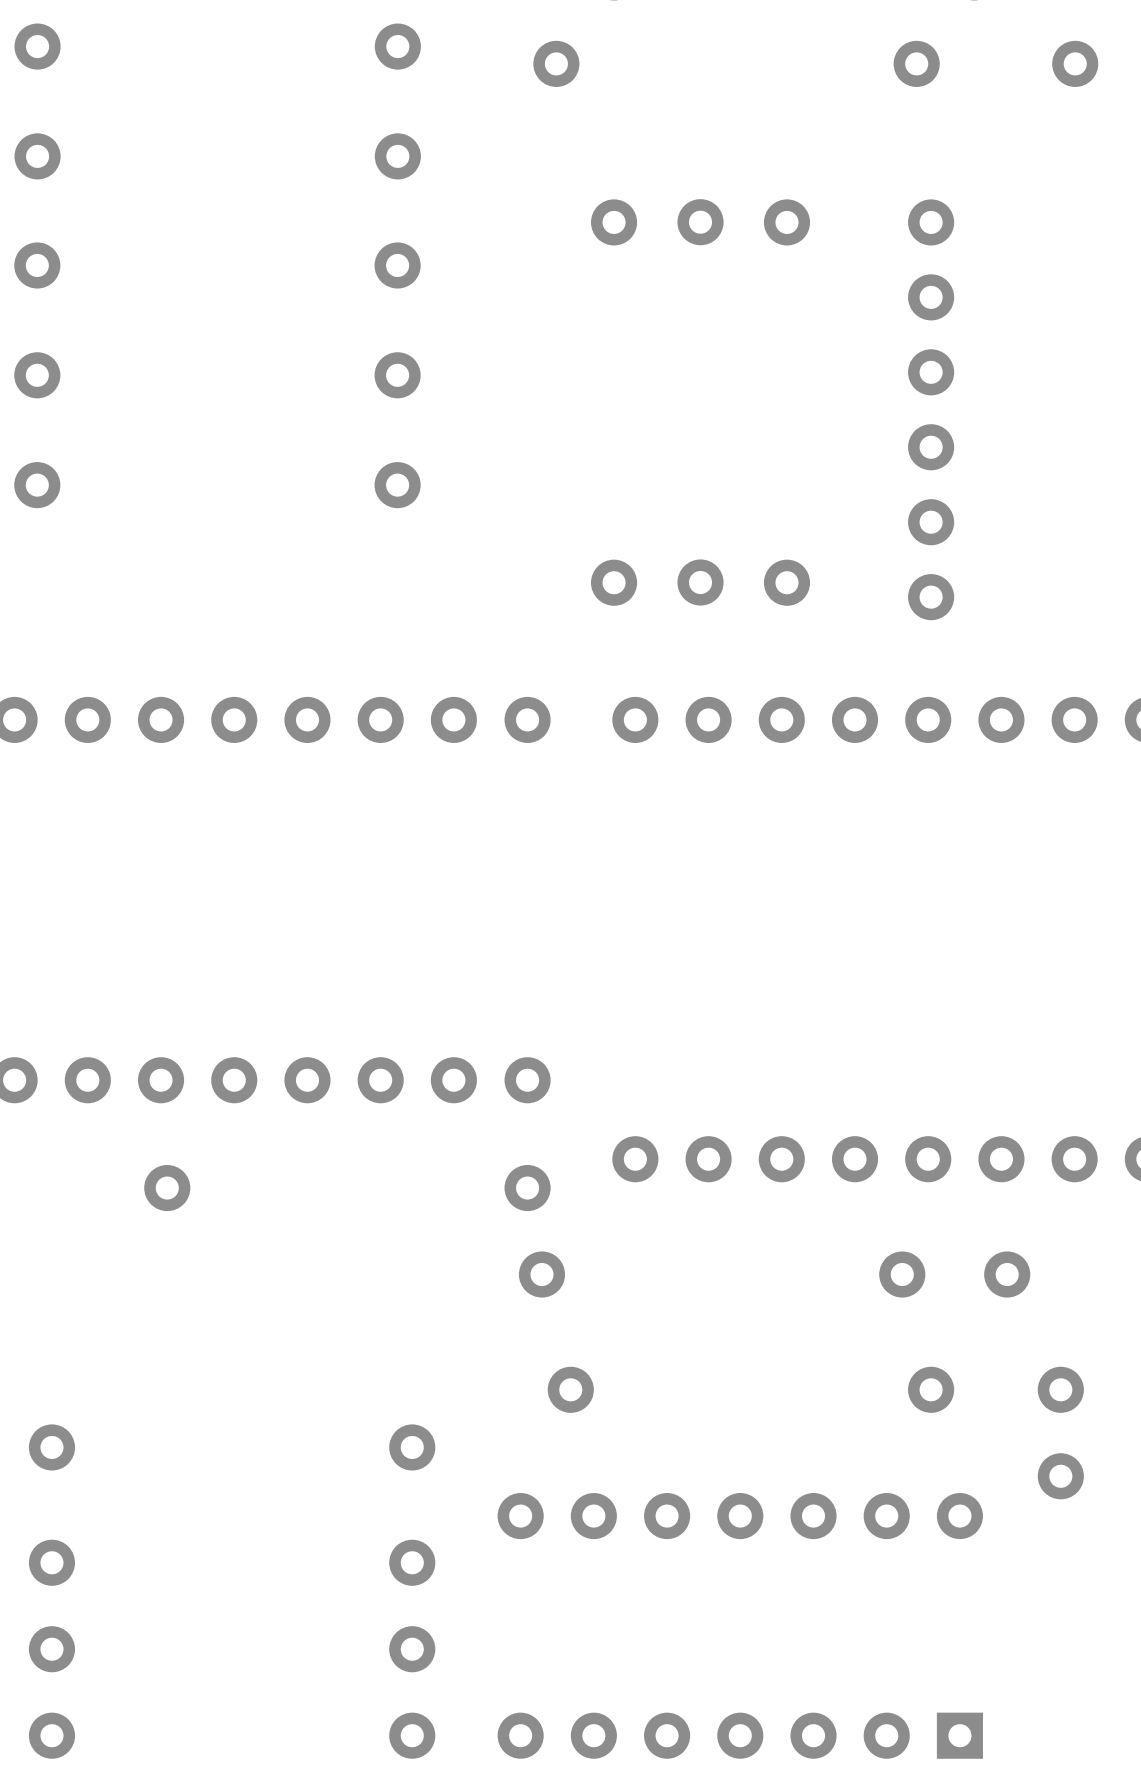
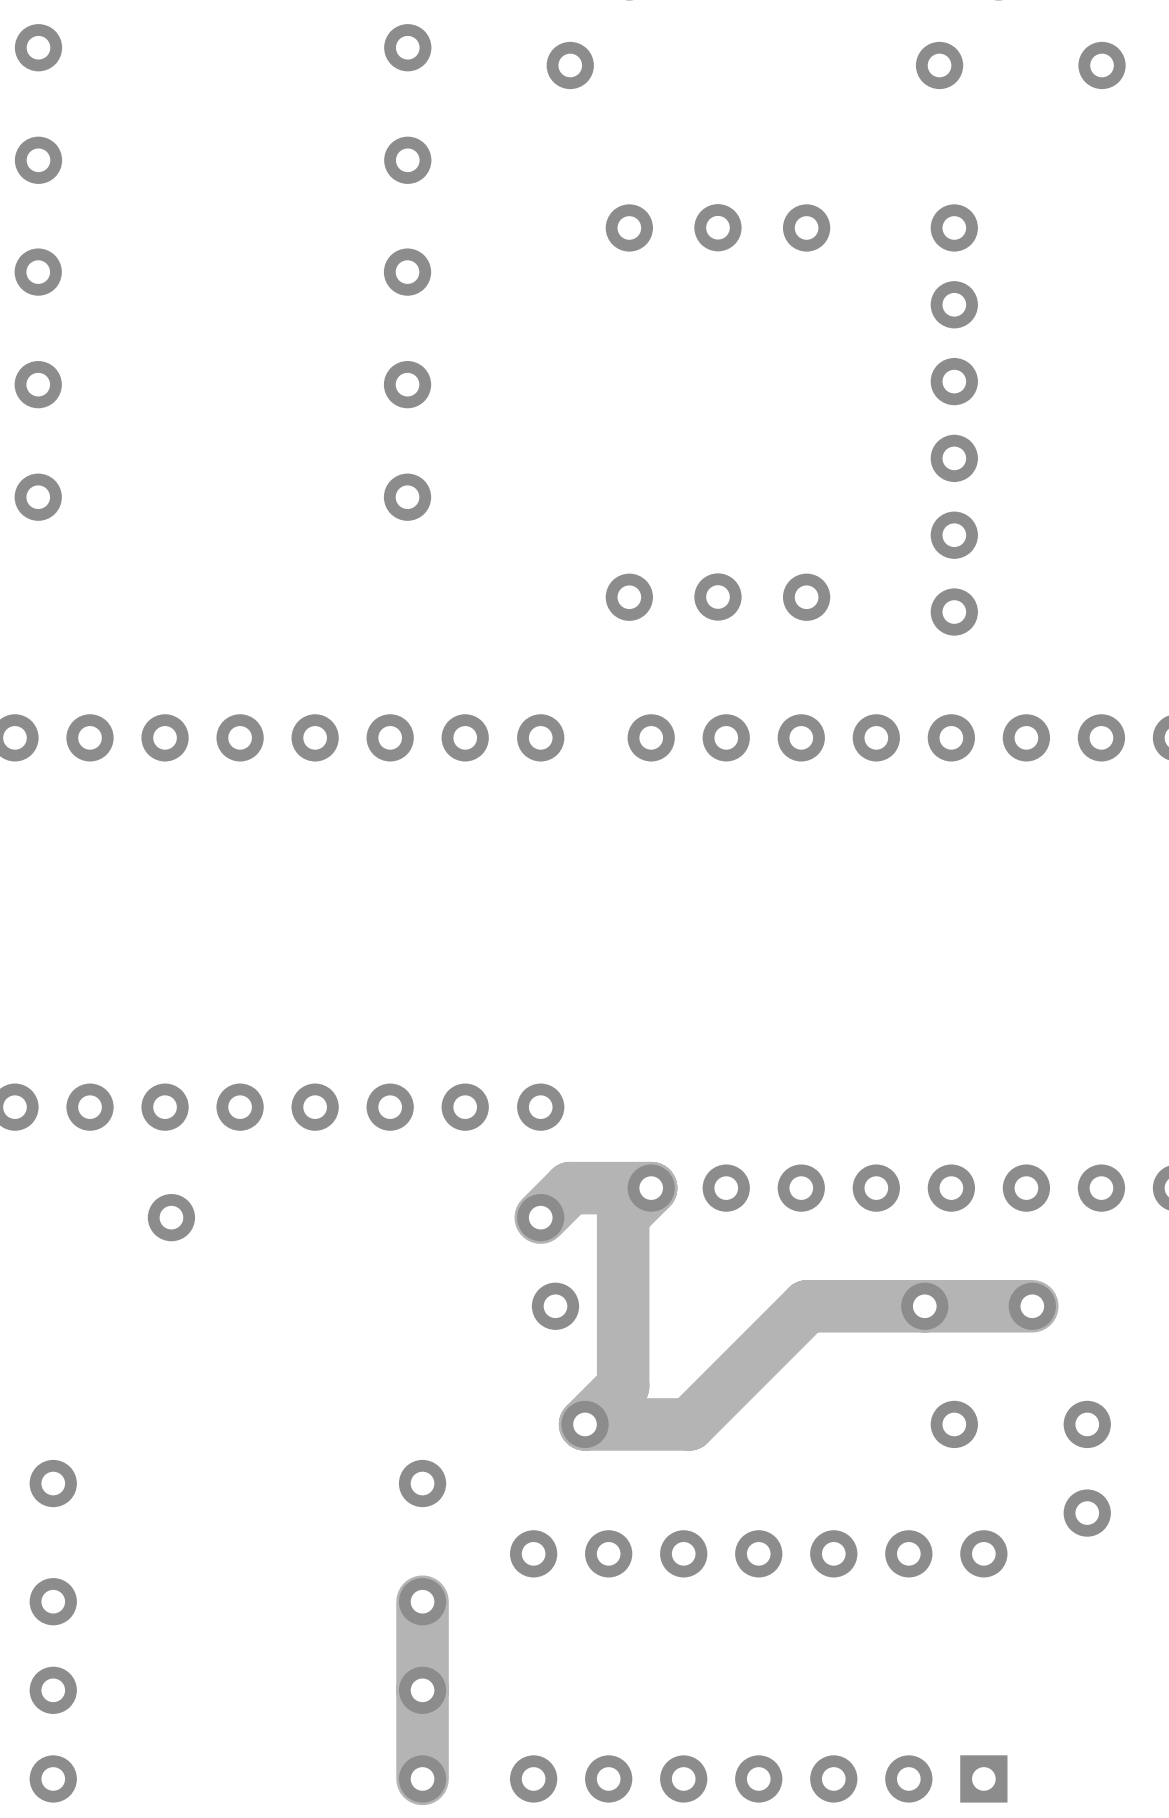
track: none -> (540, 1217) (570, 1188) (651, 1188) (623, 1216) (623, 1386) (585, 1424) (689, 1424) (807, 1306) (1032, 1306)
track: none -> (422, 1601) (422, 1778)

